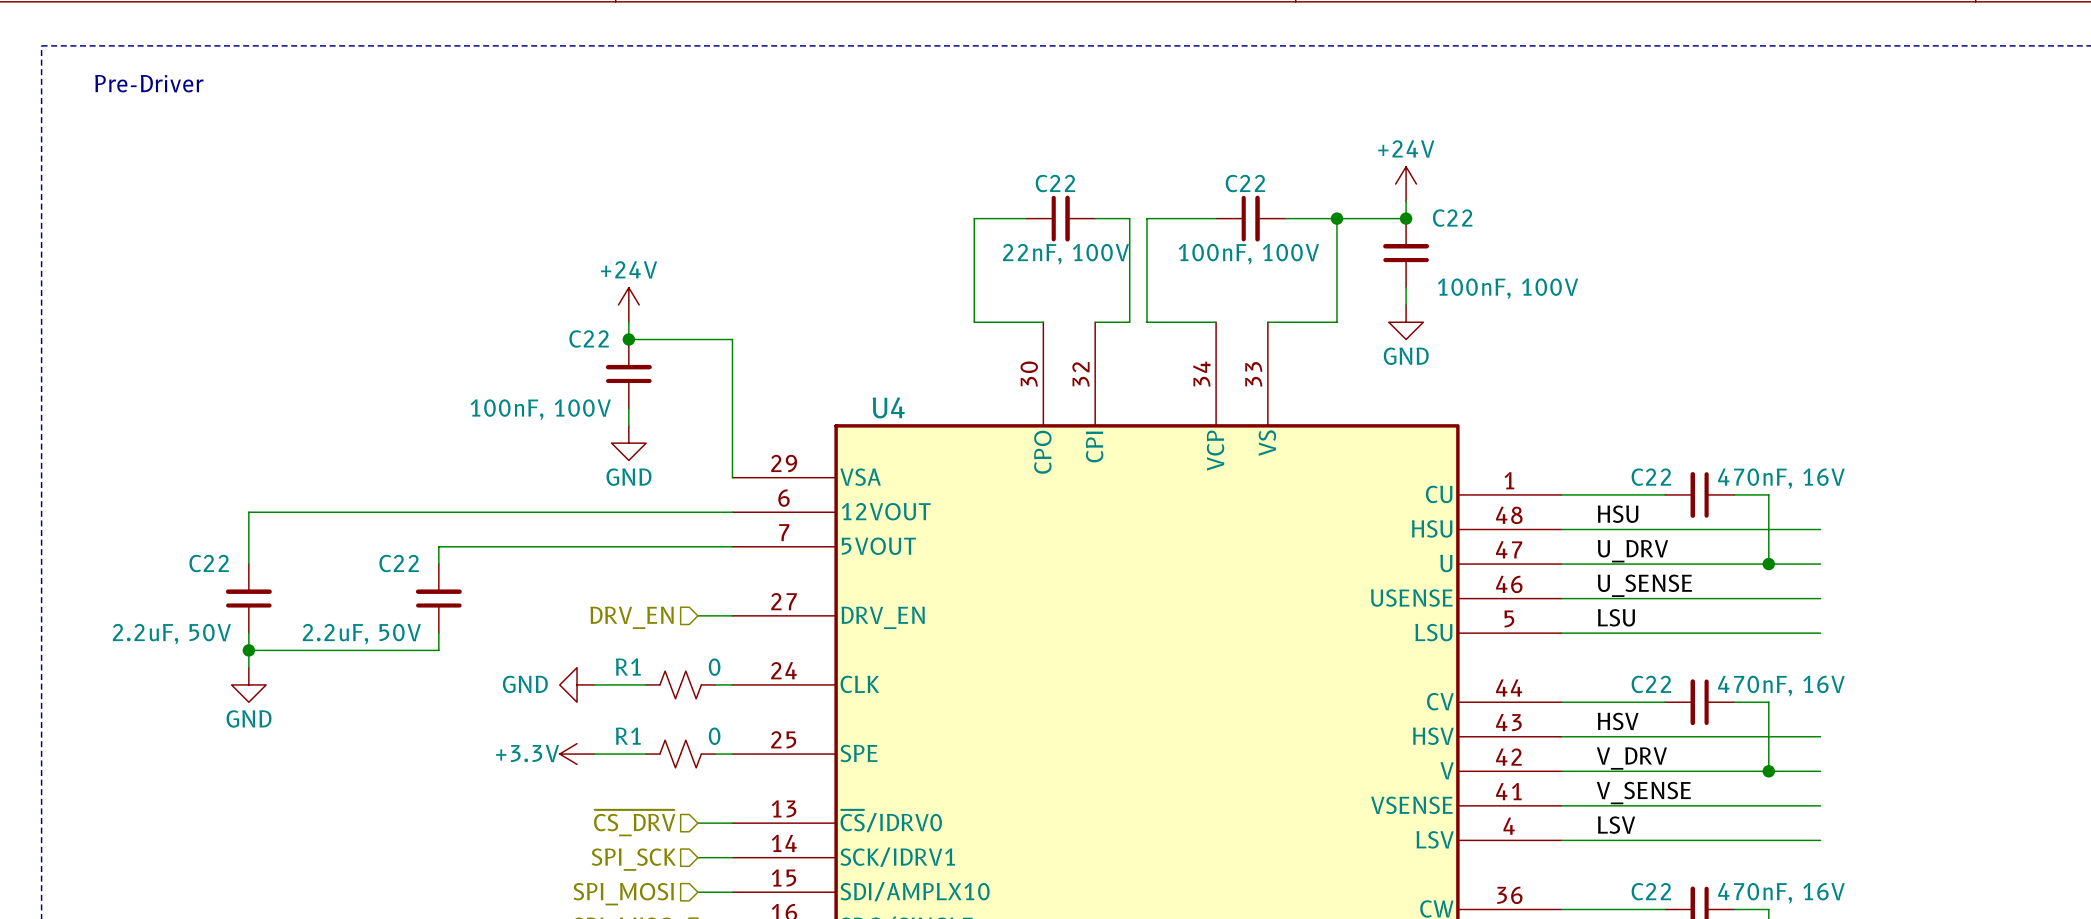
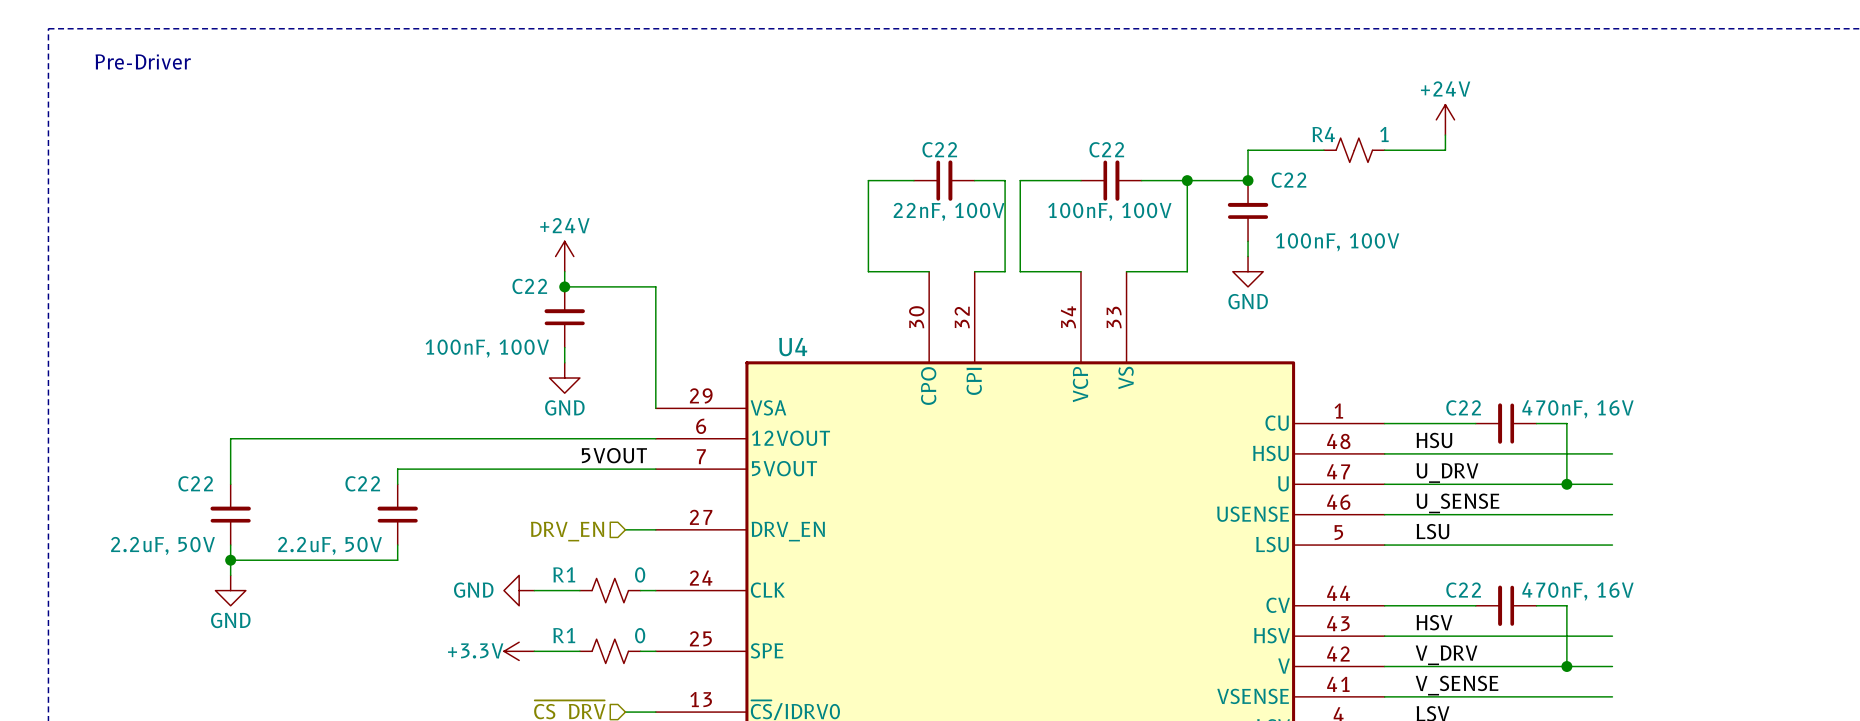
wire: none -> (1445, 135) (1445, 150) (1384, 150)
power symbol position: +24V (1406, 184) -> +24V (1445, 119)
wire: none -> (1323, 150) (1248, 150) (1248, 165)
R4: none -> 1 (1354, 150)
label: none -> 5VOUT (614, 455)

